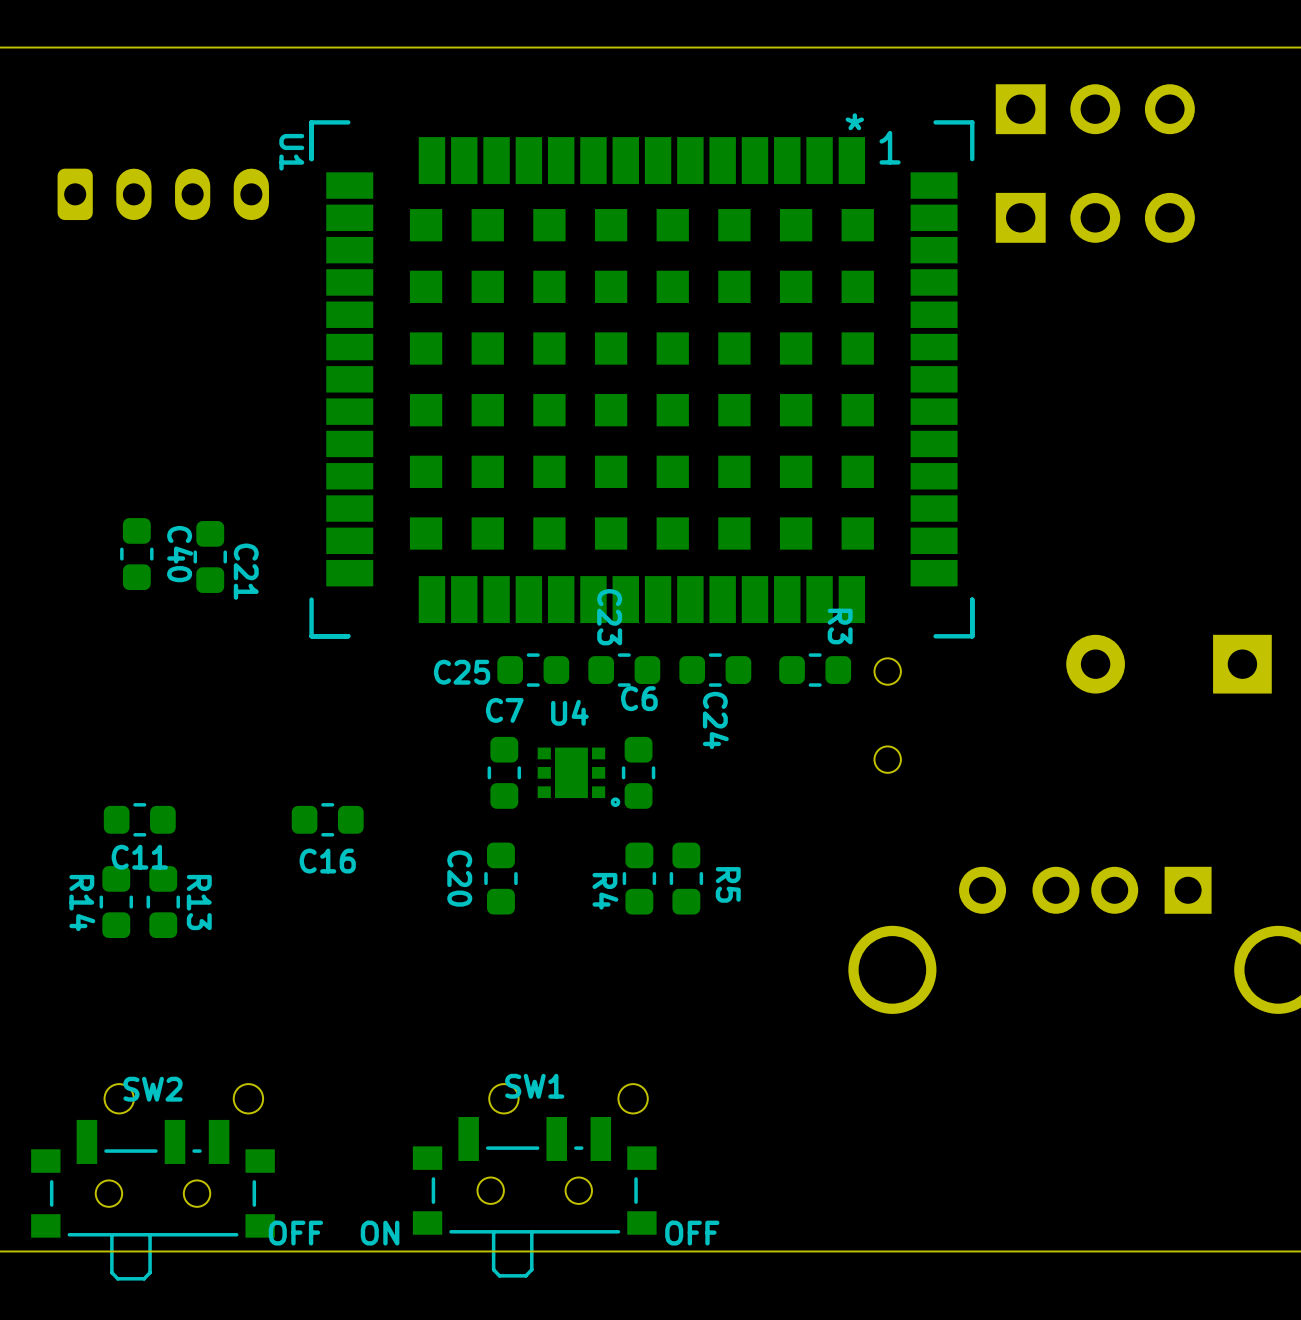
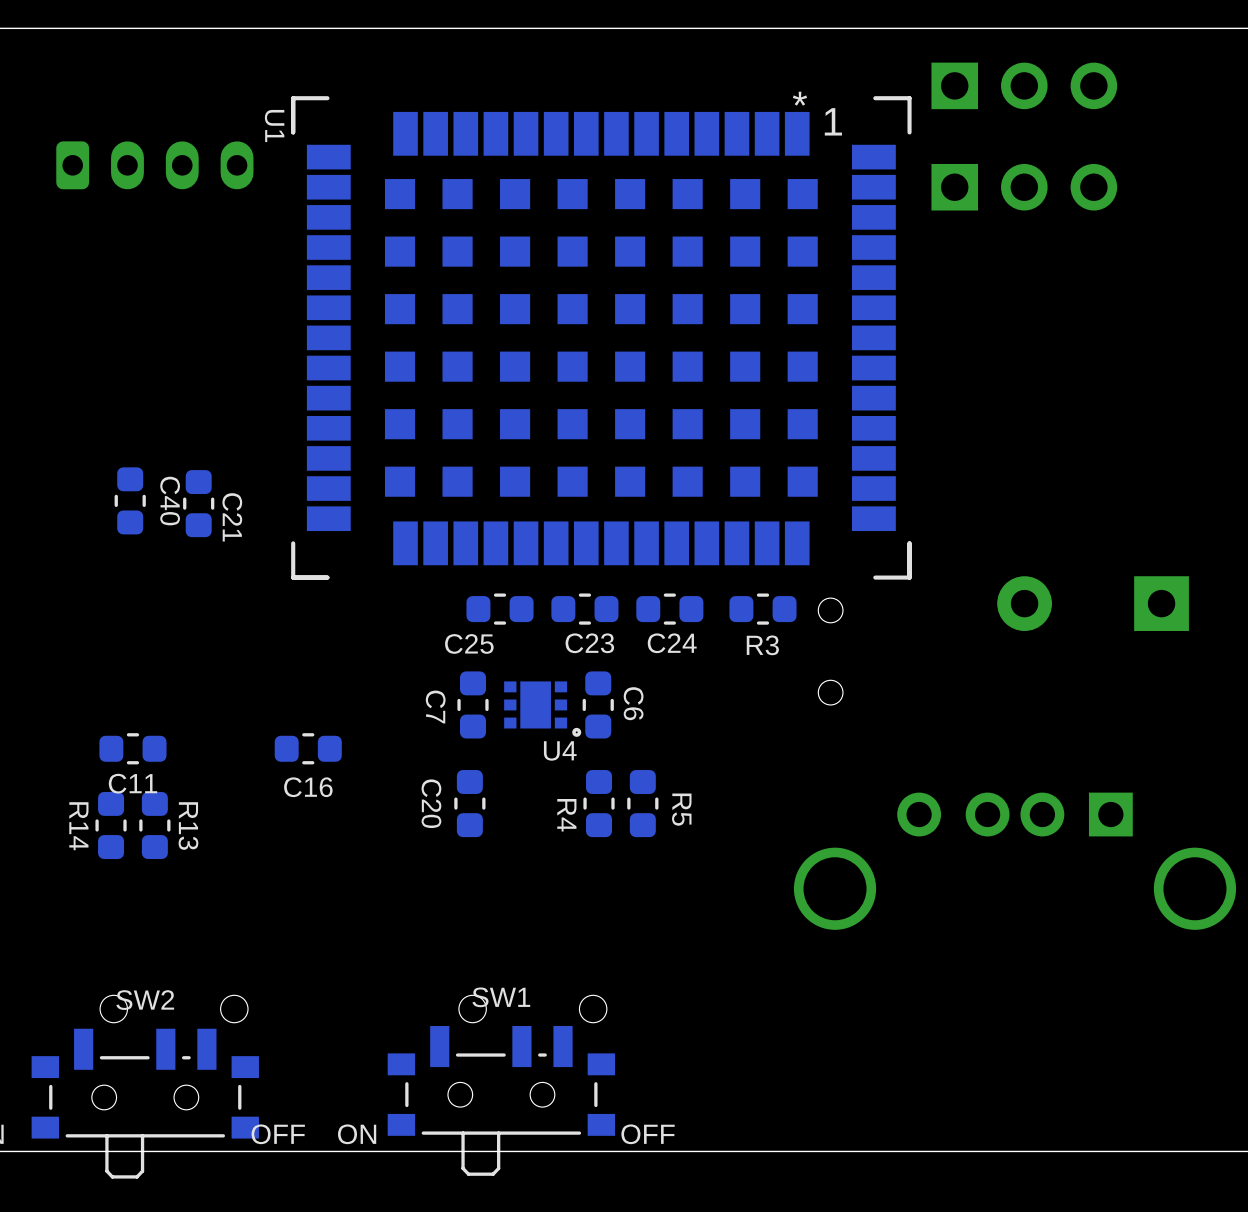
C23 name rotation: 0° (609, 617) -> 90° counterclockwise (589, 643)
C23 name position: C23 (609, 617) -> C23 (589, 643)
R3 name rotation: 0° (840, 626) -> 90° counterclockwise (762, 645)
R3 name position: R3 (840, 626) -> R3 (762, 645)
C25 name position: C25 (462, 672) -> C25 (469, 643)
C6 name rotation: 0° (639, 698) -> 90° clockwise (633, 703)
C6 name position: C6 (639, 698) -> C6 (633, 703)
C7 name rotation: 0° (504, 710) -> 90° clockwise (435, 707)
C7 name position: C7 (504, 710) -> C7 (435, 707)
U4 name position: U4 (569, 712) -> U4 (560, 750)
C24 name rotation: 0° (715, 720) -> 90° counterclockwise (672, 643)

